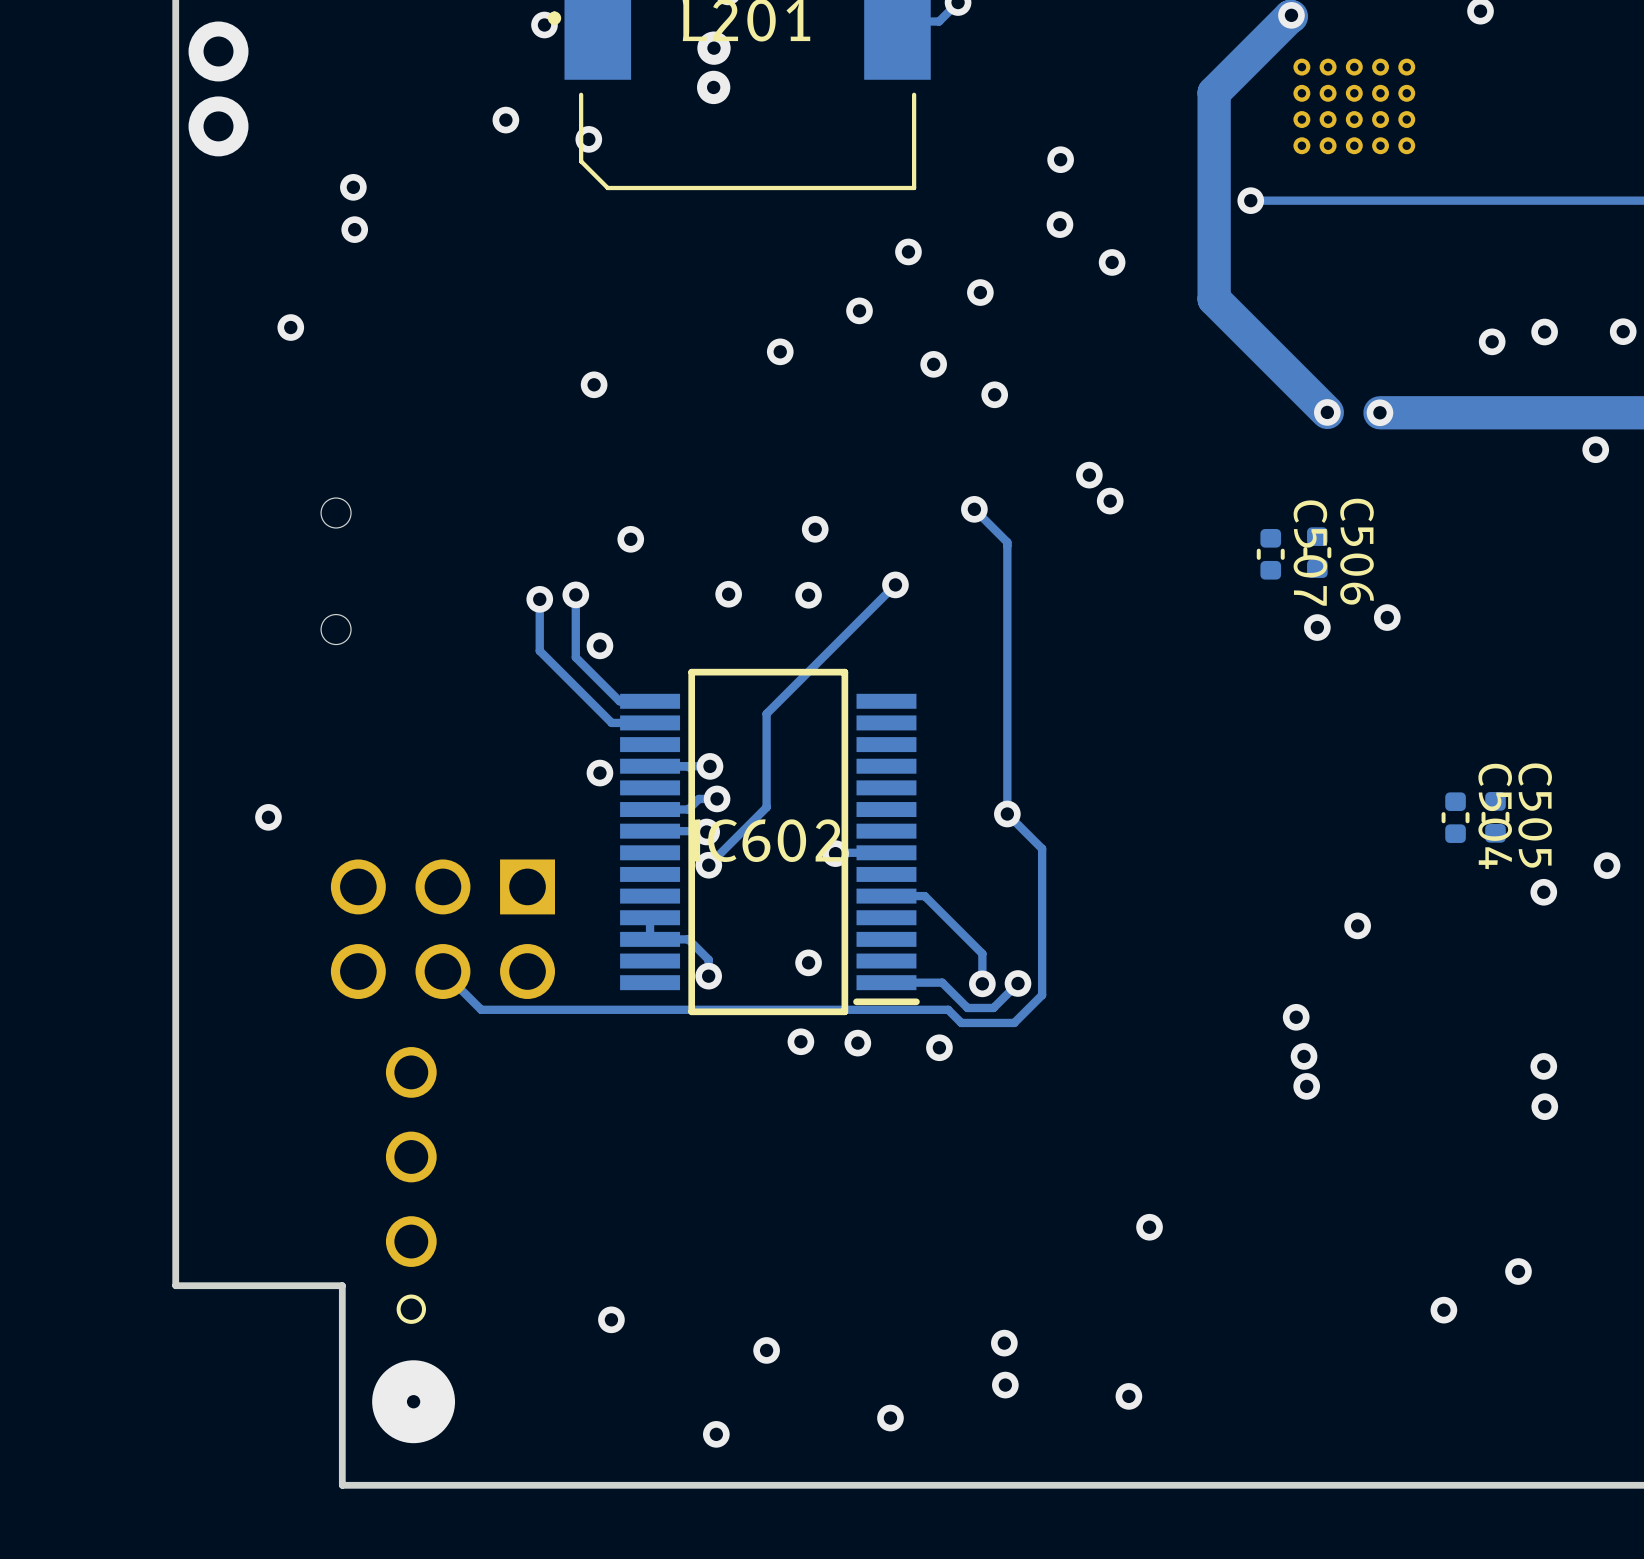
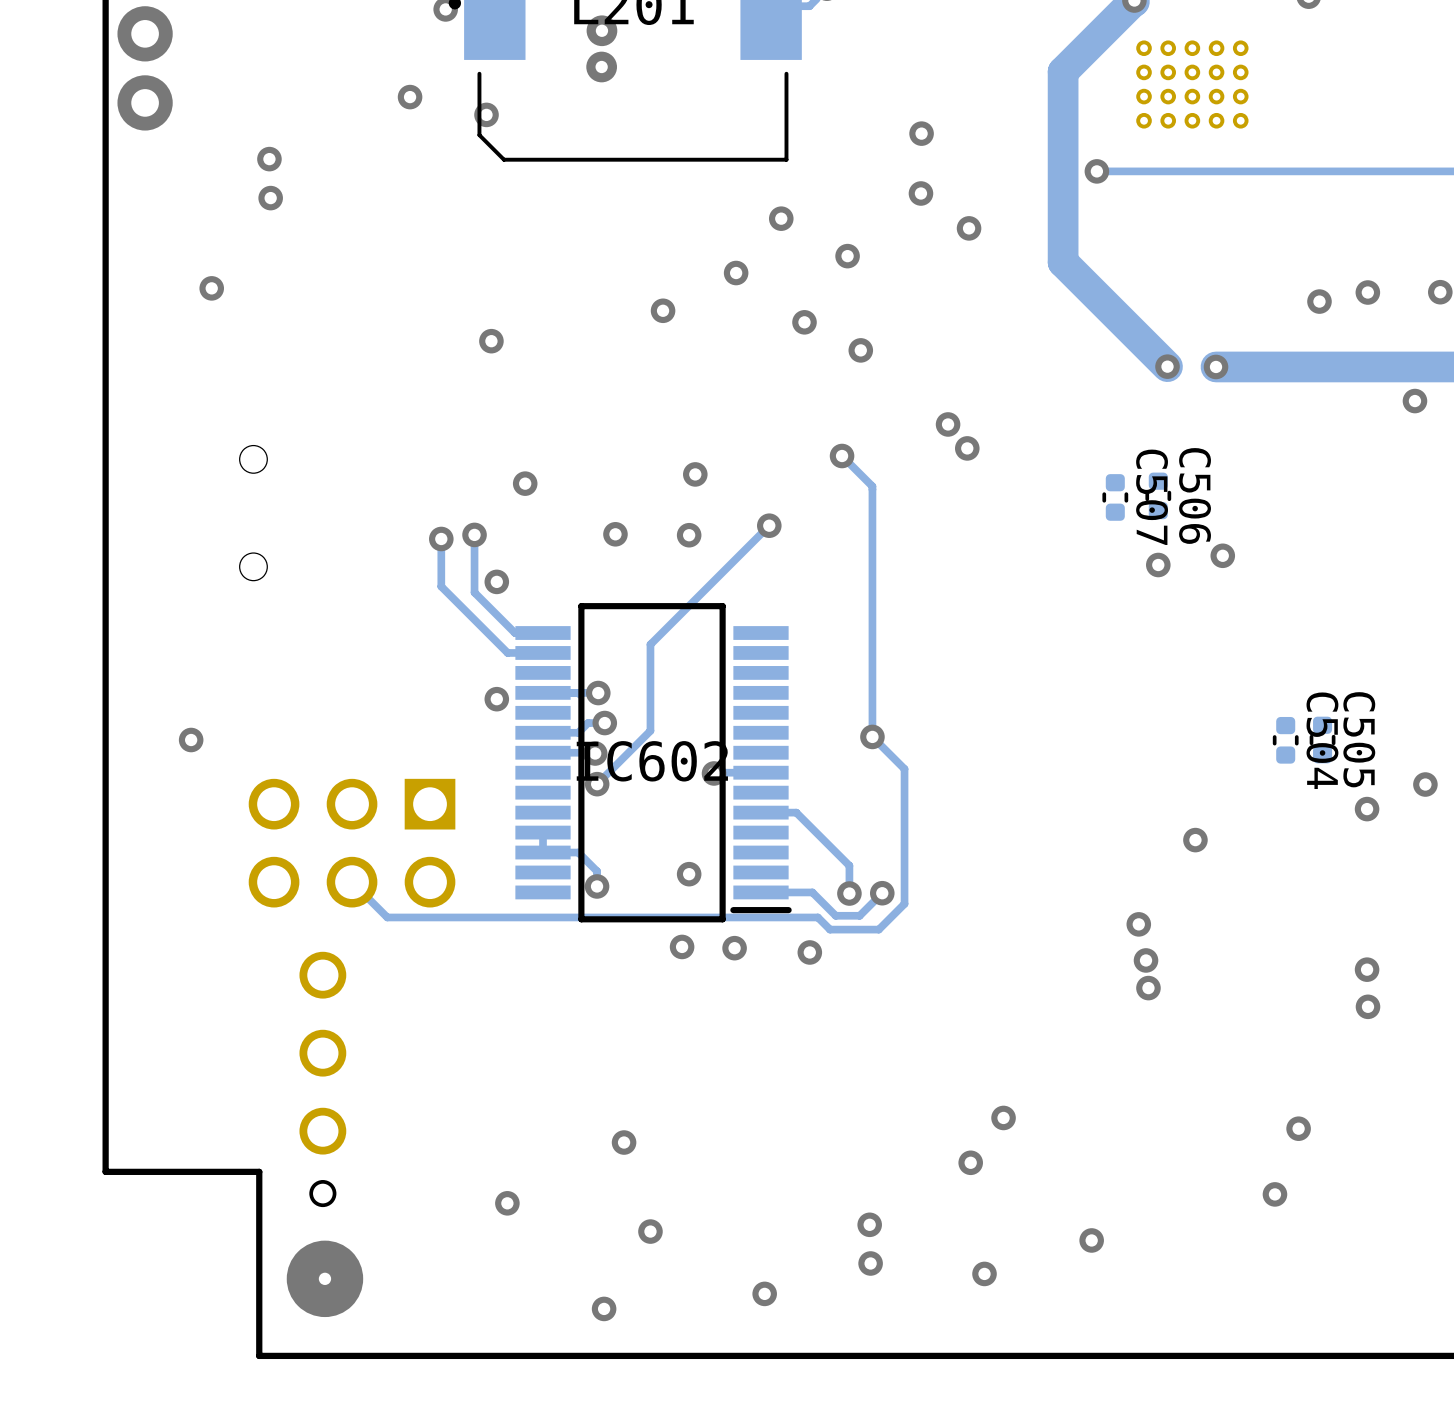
via: none -> (624, 1142)
via position: (1518, 1271) -> (1298, 1128)
via: none -> (970, 1162)
via: none -> (1091, 1240)

